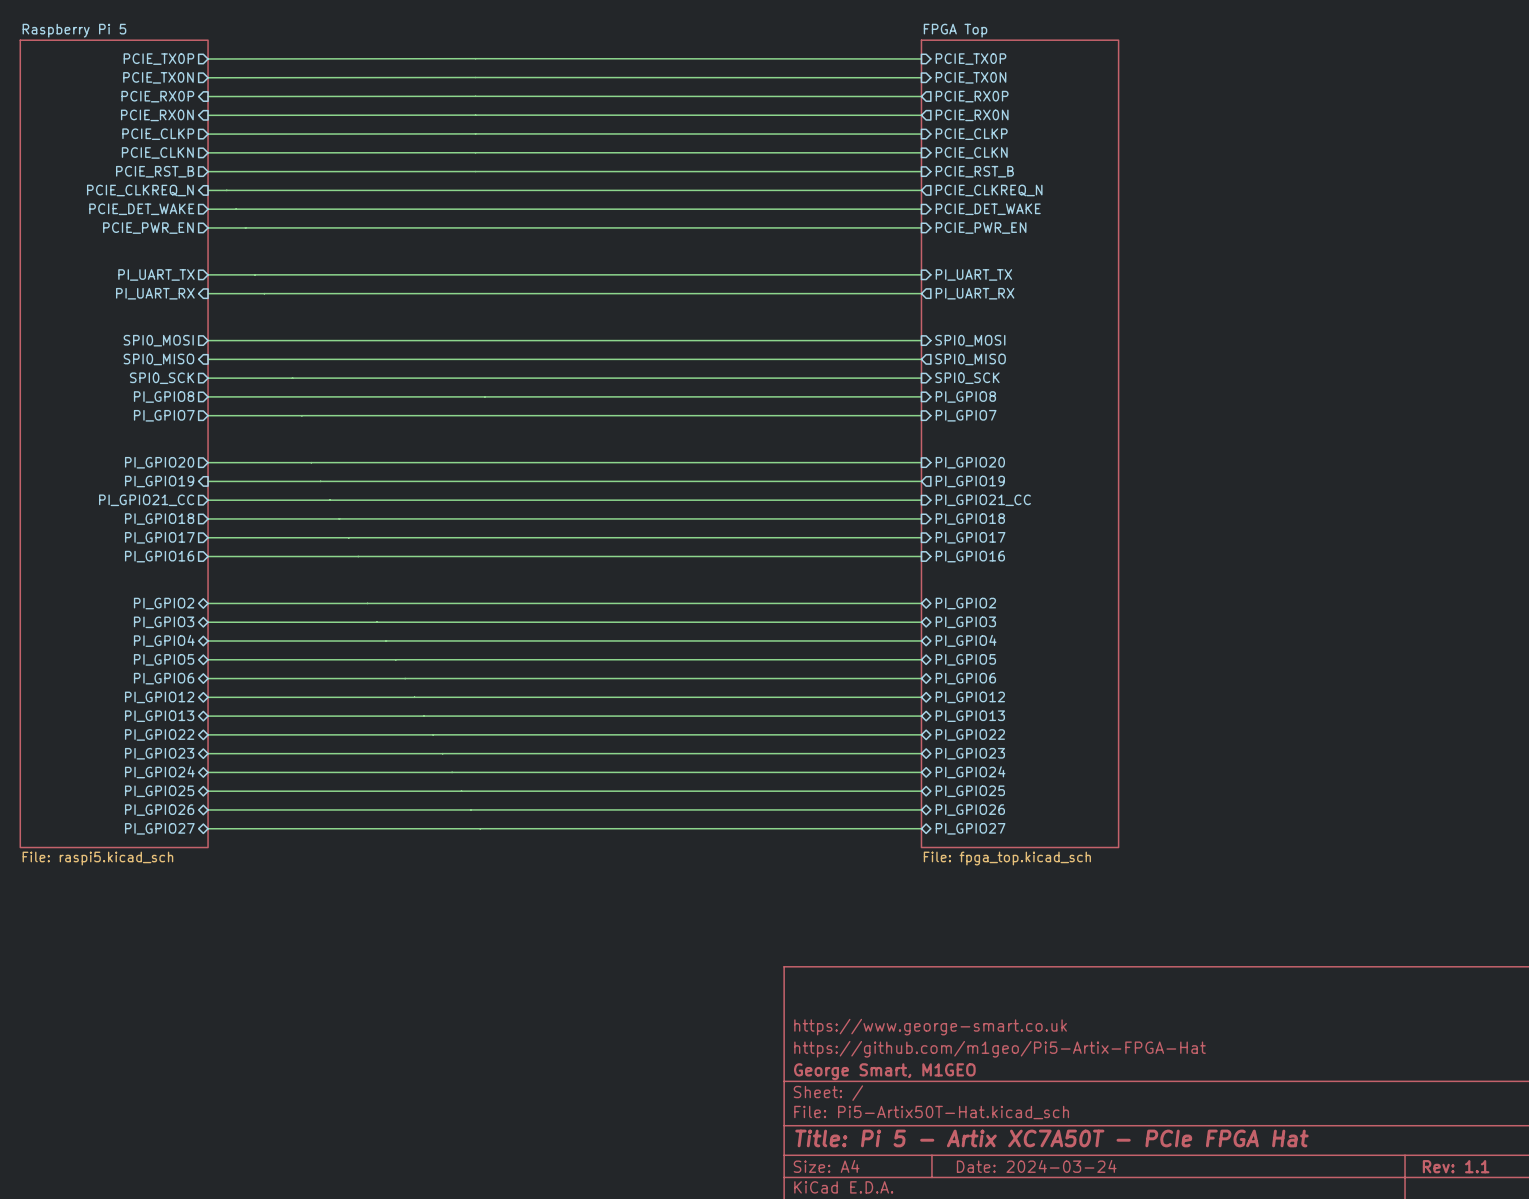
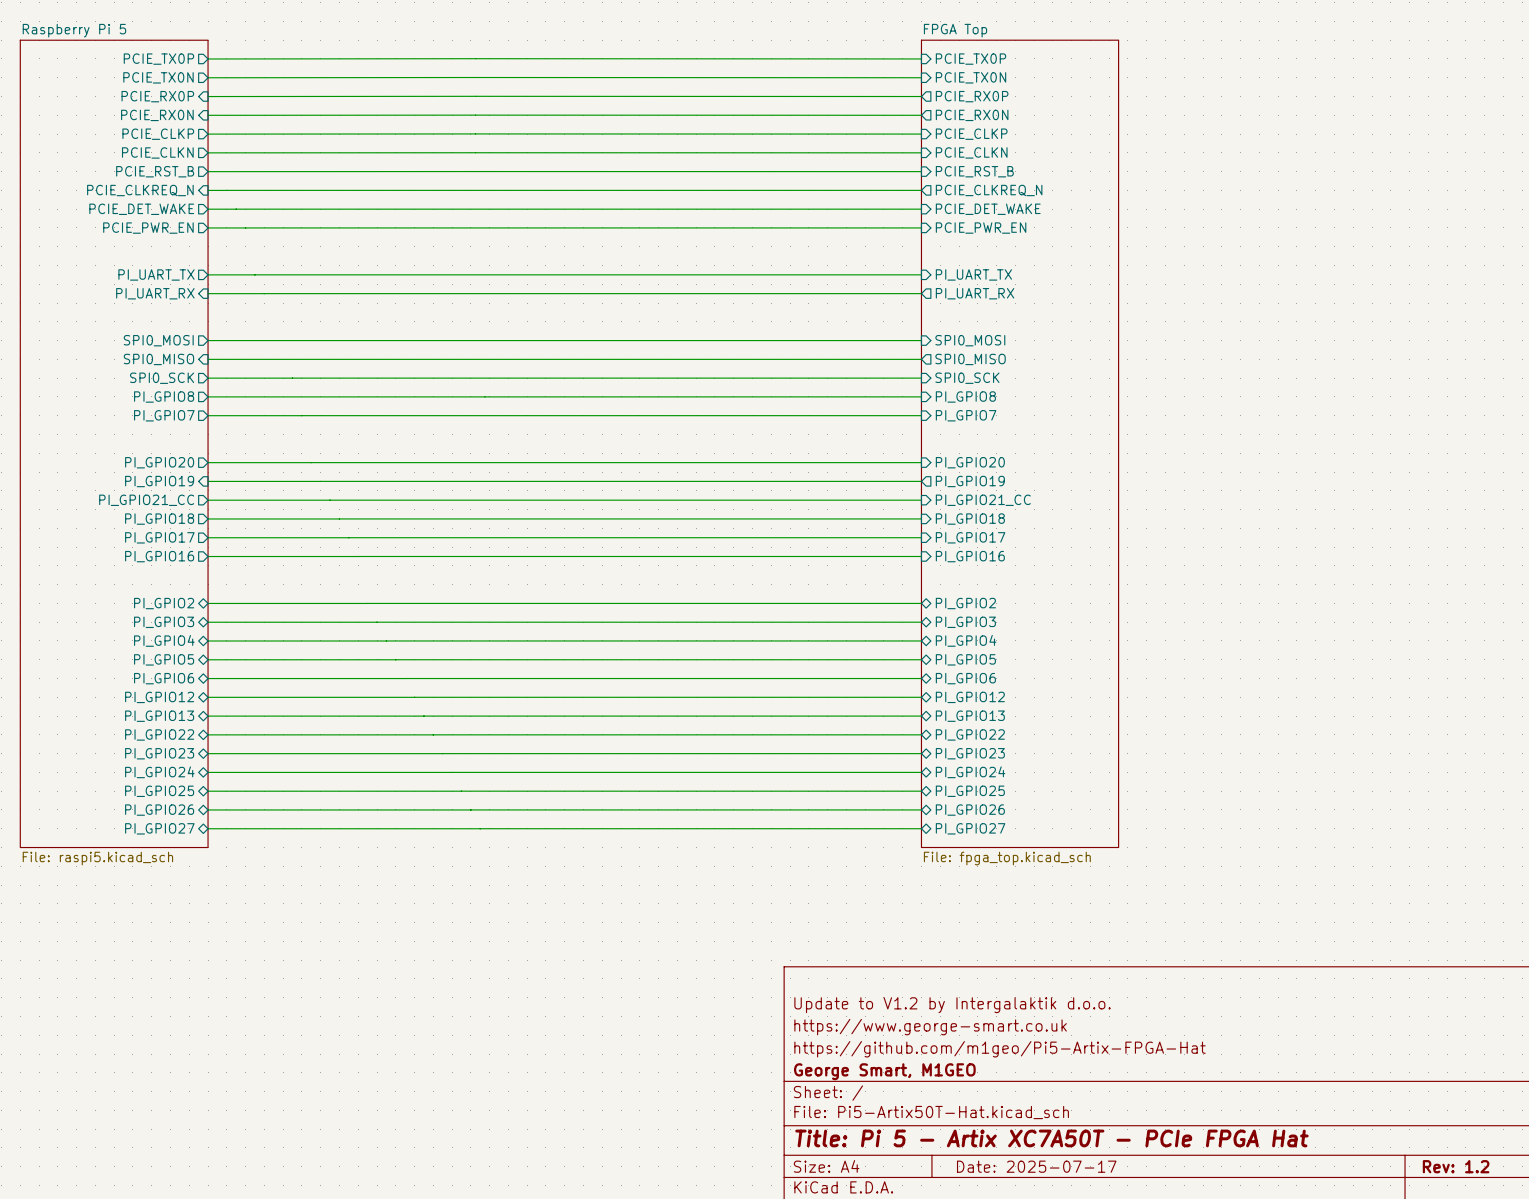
title block: none -> Update to V1.2 by Intergalaktik d.o.o. (952, 1005)
title block: Date: 2024-03-24 (1036, 1166) -> Date: 2025-07-17 (1036, 1166)
title block: Rev: 1.1 (1456, 1166) -> Rev: 1.2 (1456, 1166)

